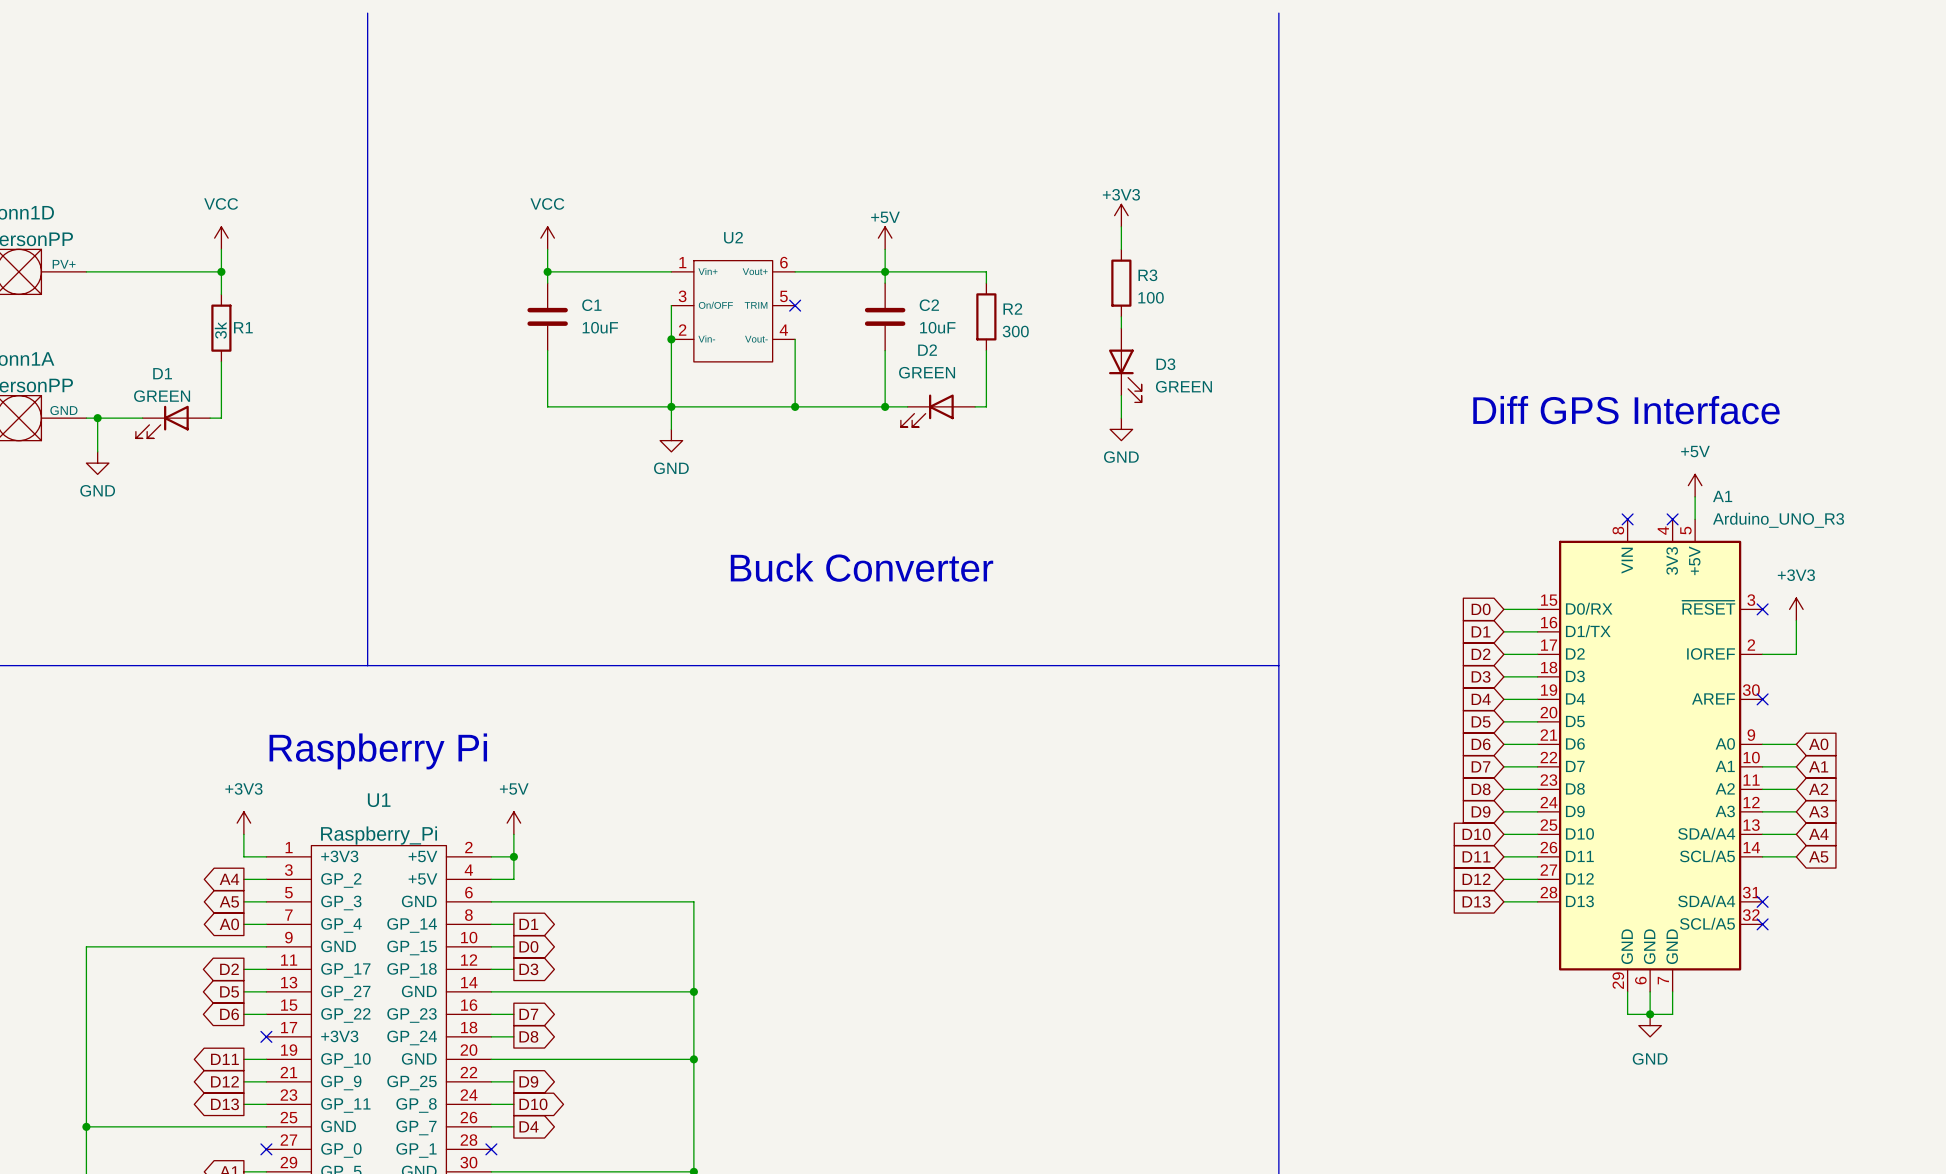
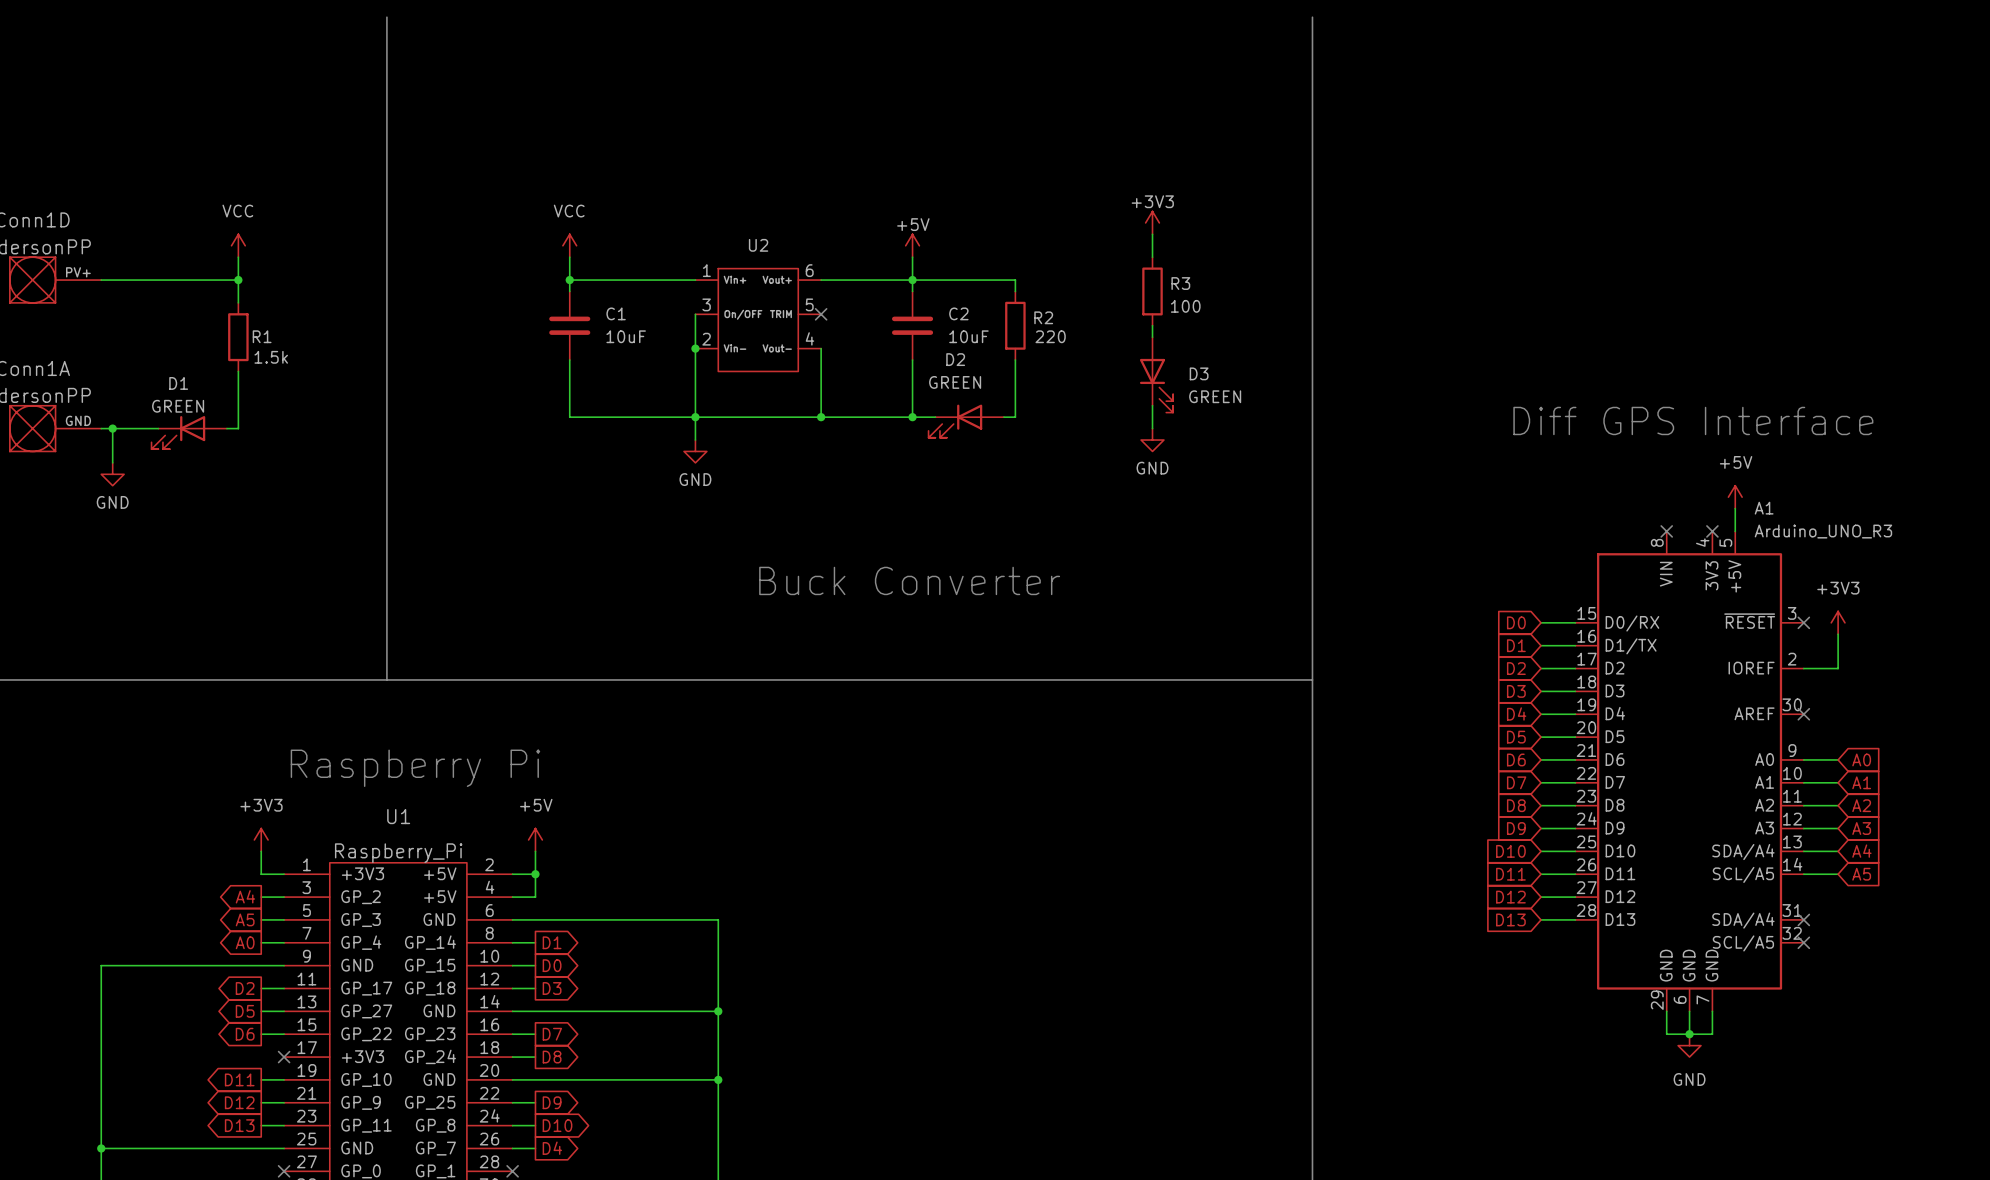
R1 value: 3k (220, 330) -> 1.5k (271, 357)
R2 value: 300 (1015, 331) -> 220 (1050, 336)

